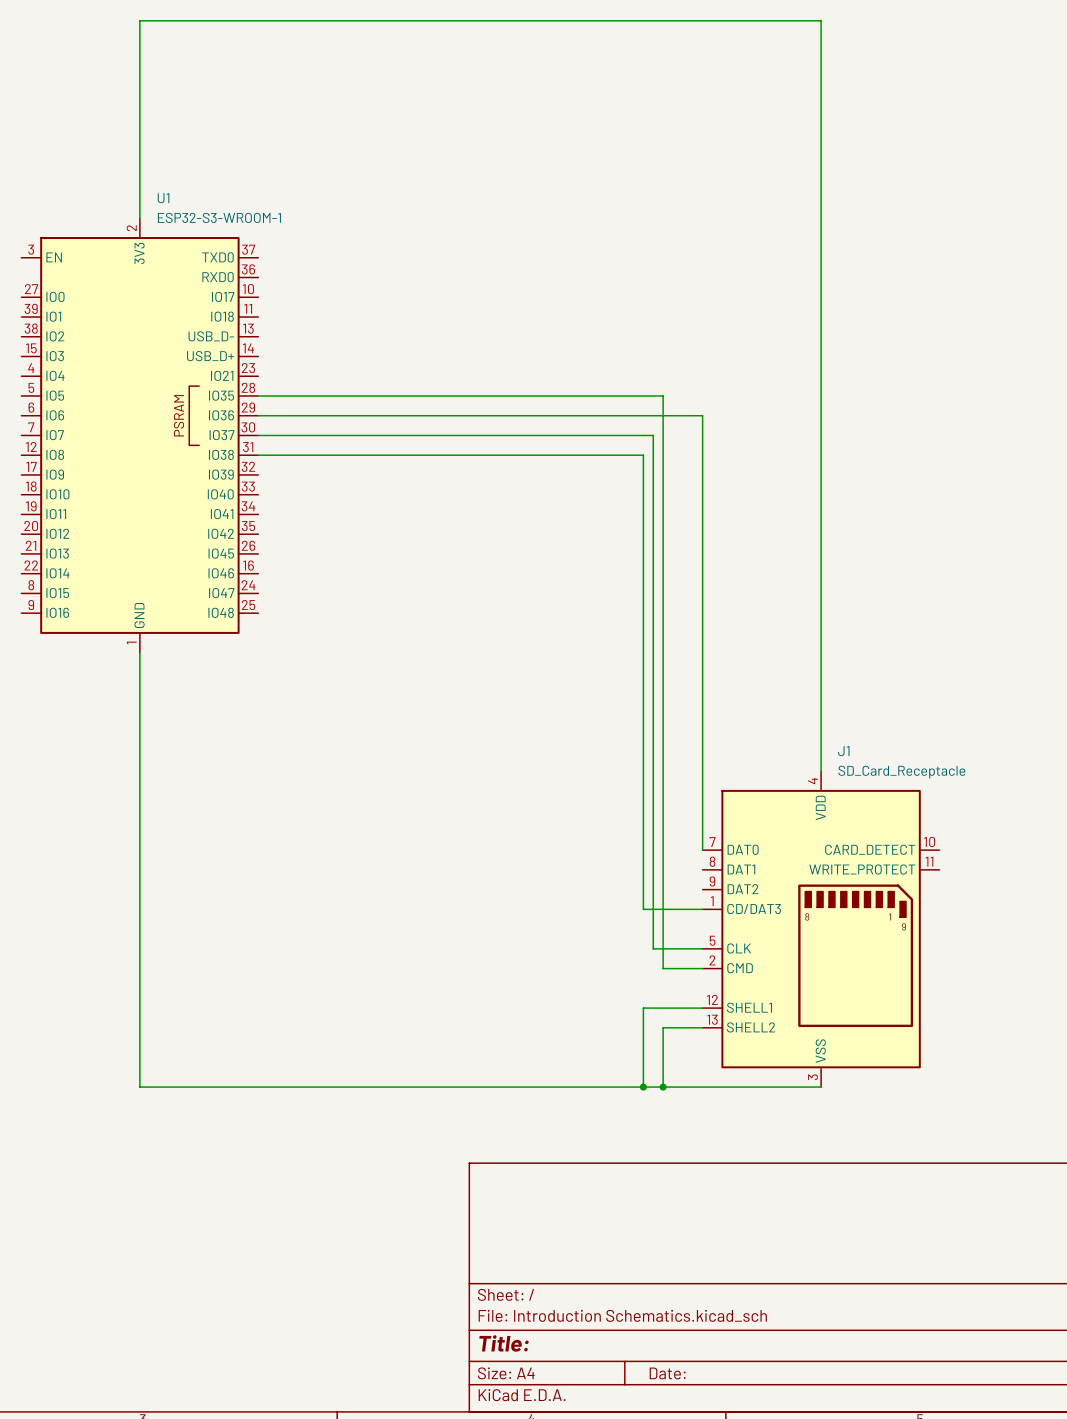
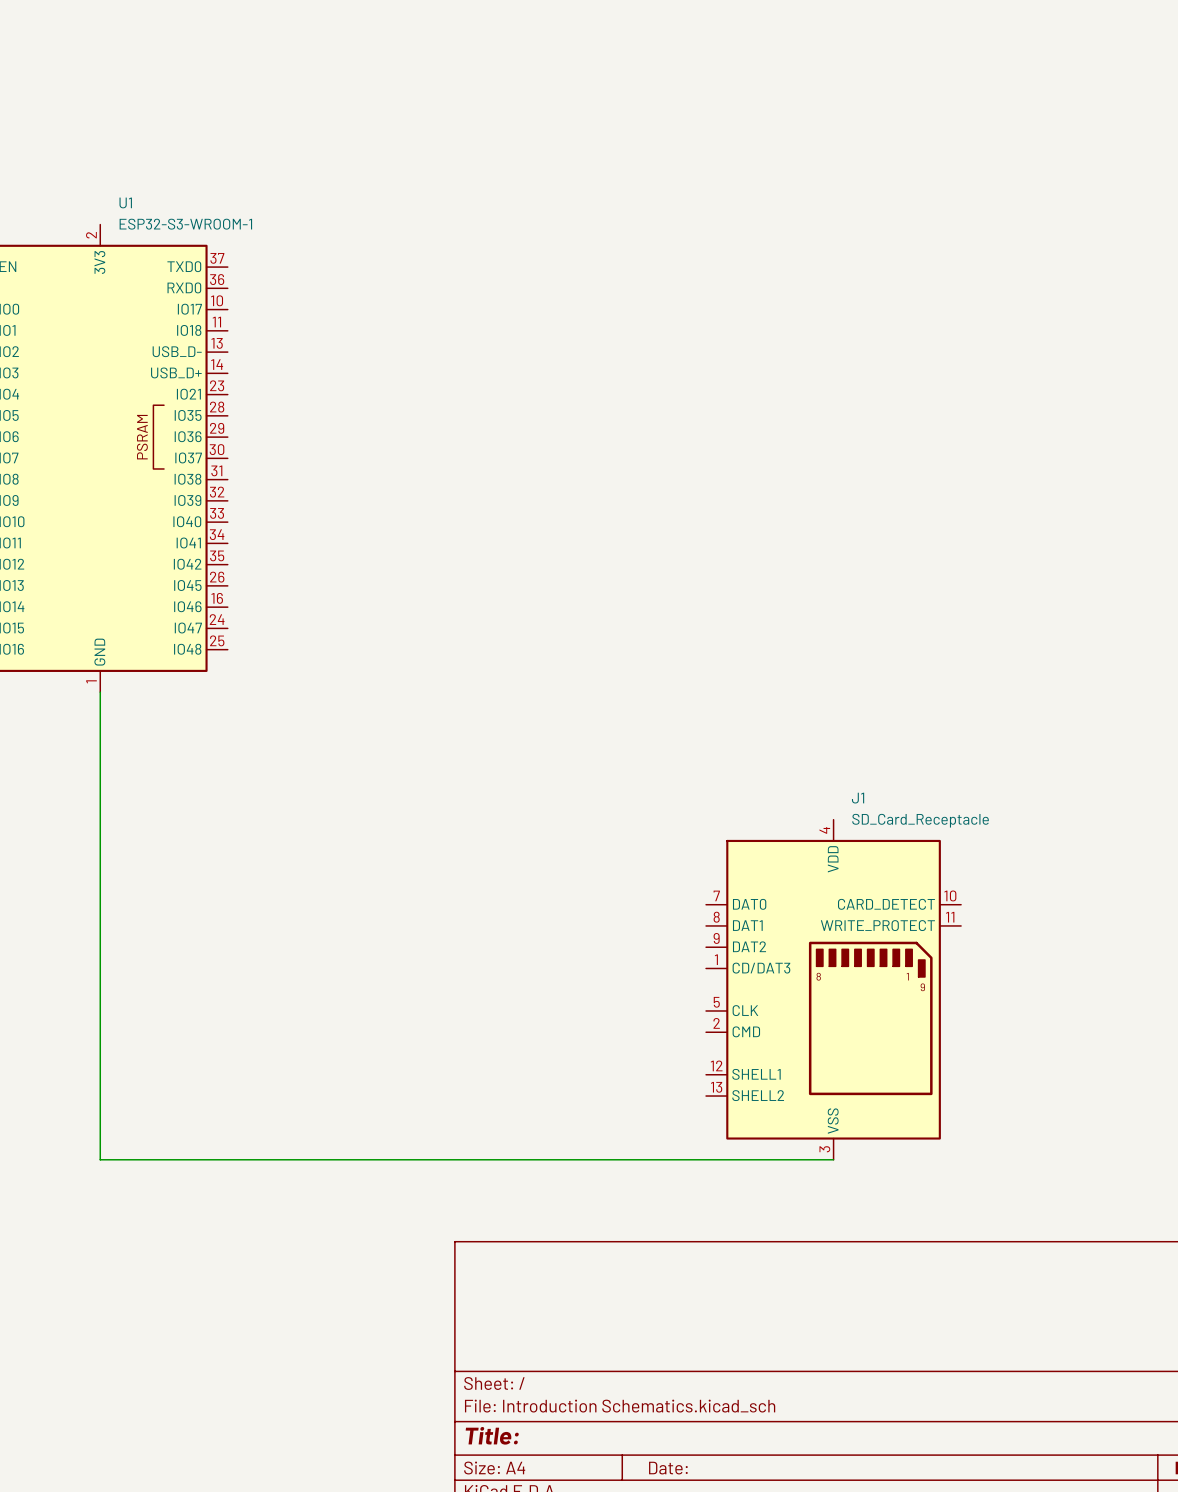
wire: (139, 218) (139, 20) (821, 20) (821, 771) -> none
wire: (258, 395) (663, 395) (663, 968) (702, 968) -> none
wire: (258, 415) (702, 415) (702, 850) -> none
wire: (258, 435) (653, 435) (653, 948) (702, 948) -> none
wire: (258, 455) (643, 455) (643, 909) (702, 909) -> none
wire: (702, 1008) (643, 1008) (643, 1087) -> none
wire: (702, 1027) (663, 1027) (663, 1087) -> none
junction: (643, 1087) -> none
junction: (663, 1087) -> none

